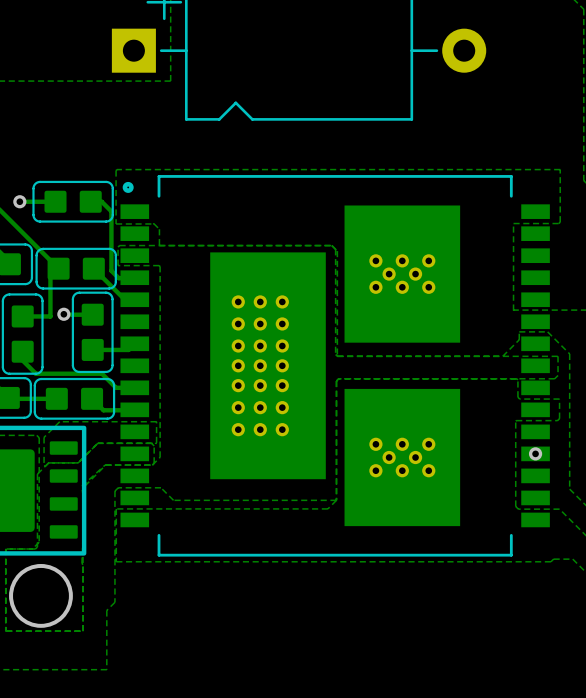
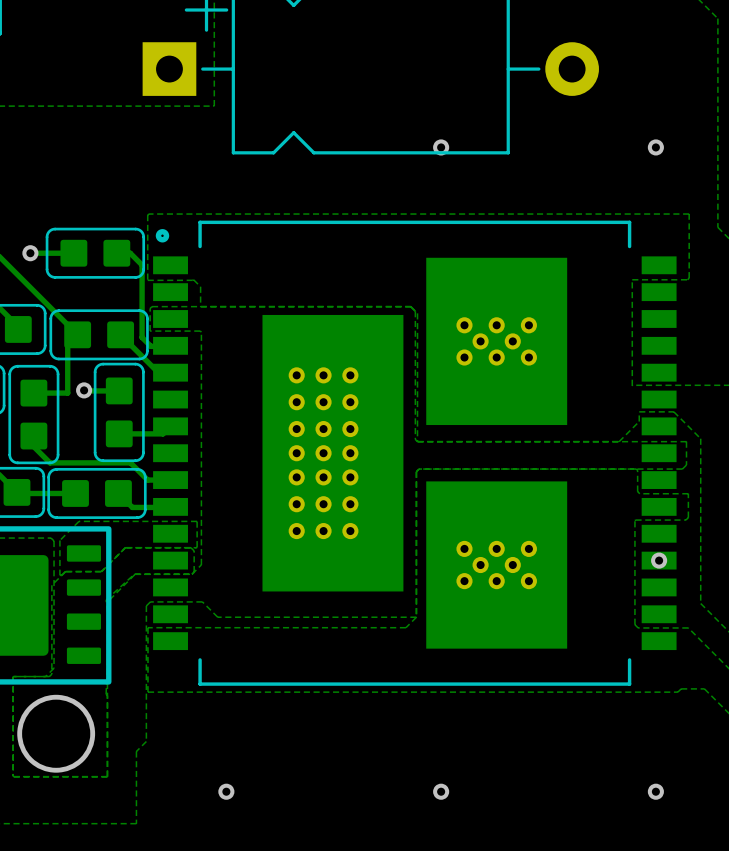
via: none -> (441, 147)
via: none -> (655, 147)
via: none -> (226, 791)
via: none -> (441, 791)
via: none -> (655, 791)

